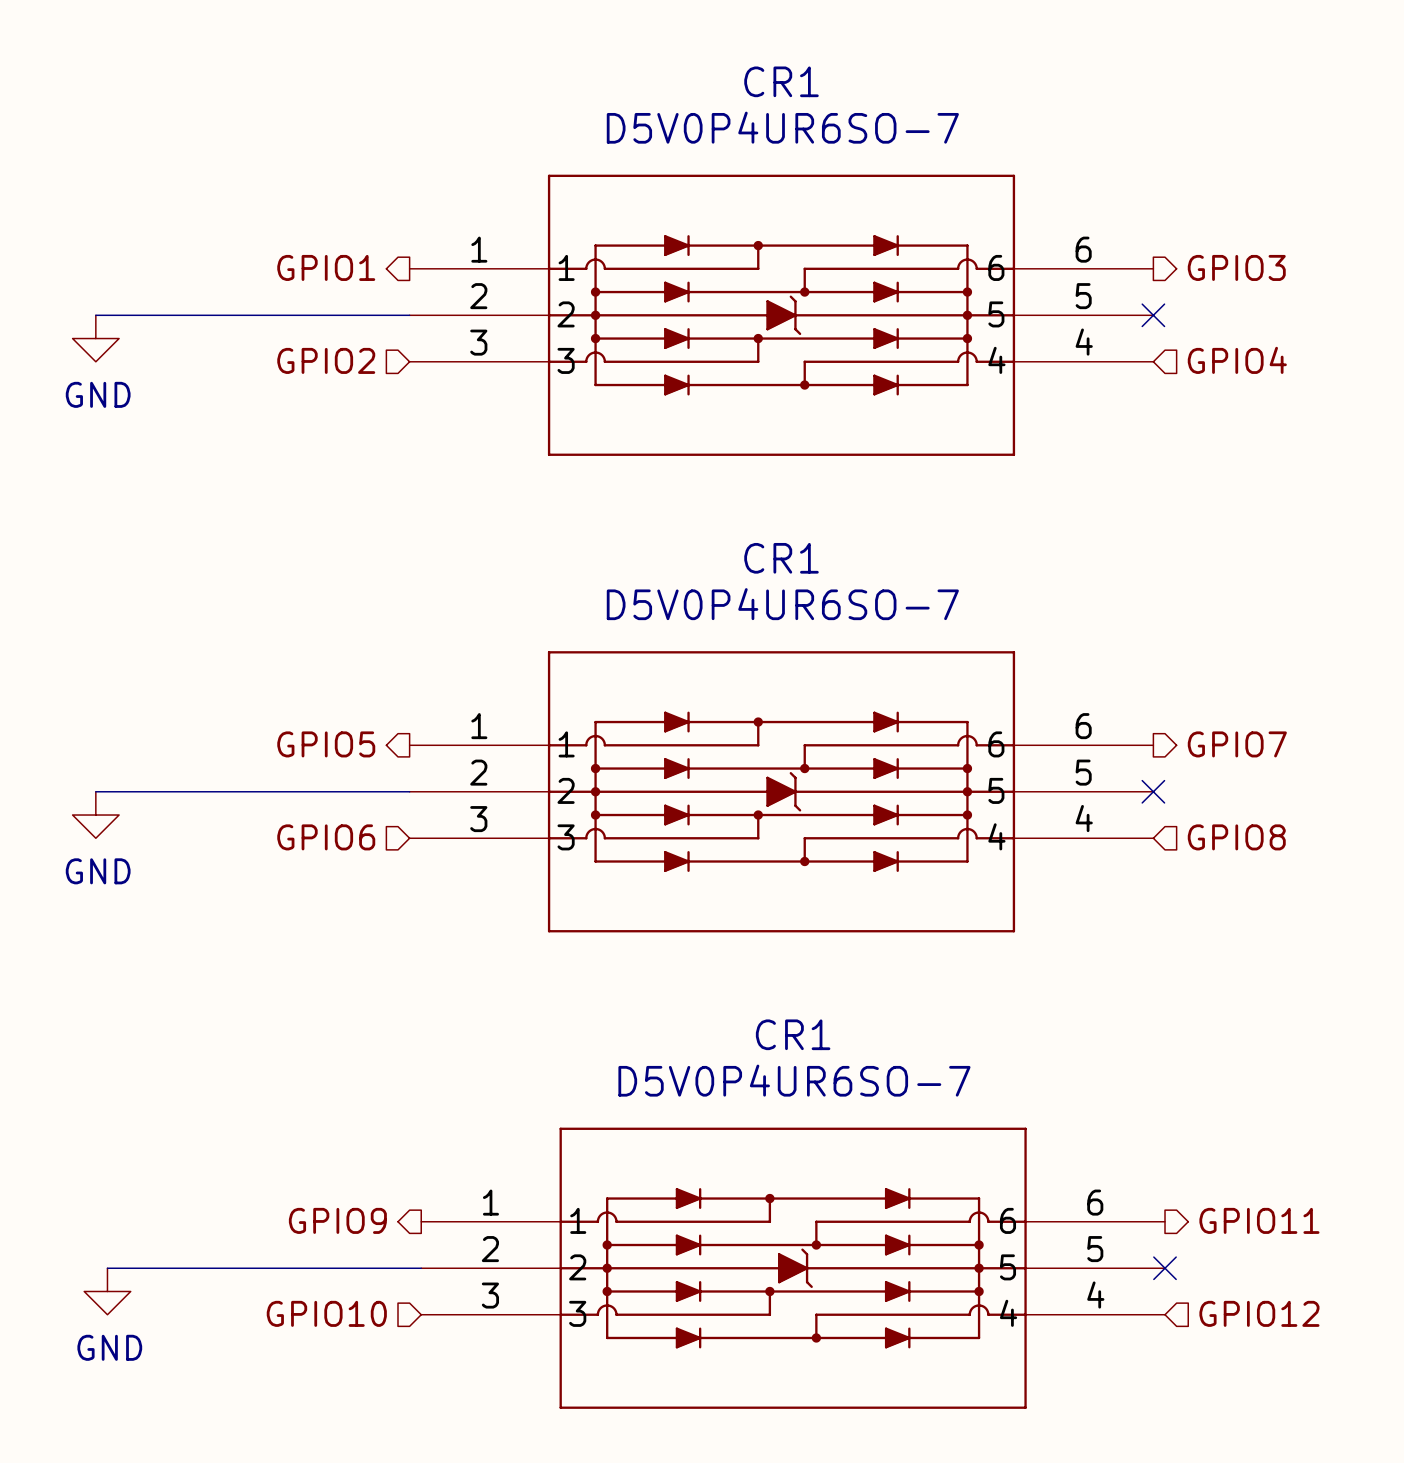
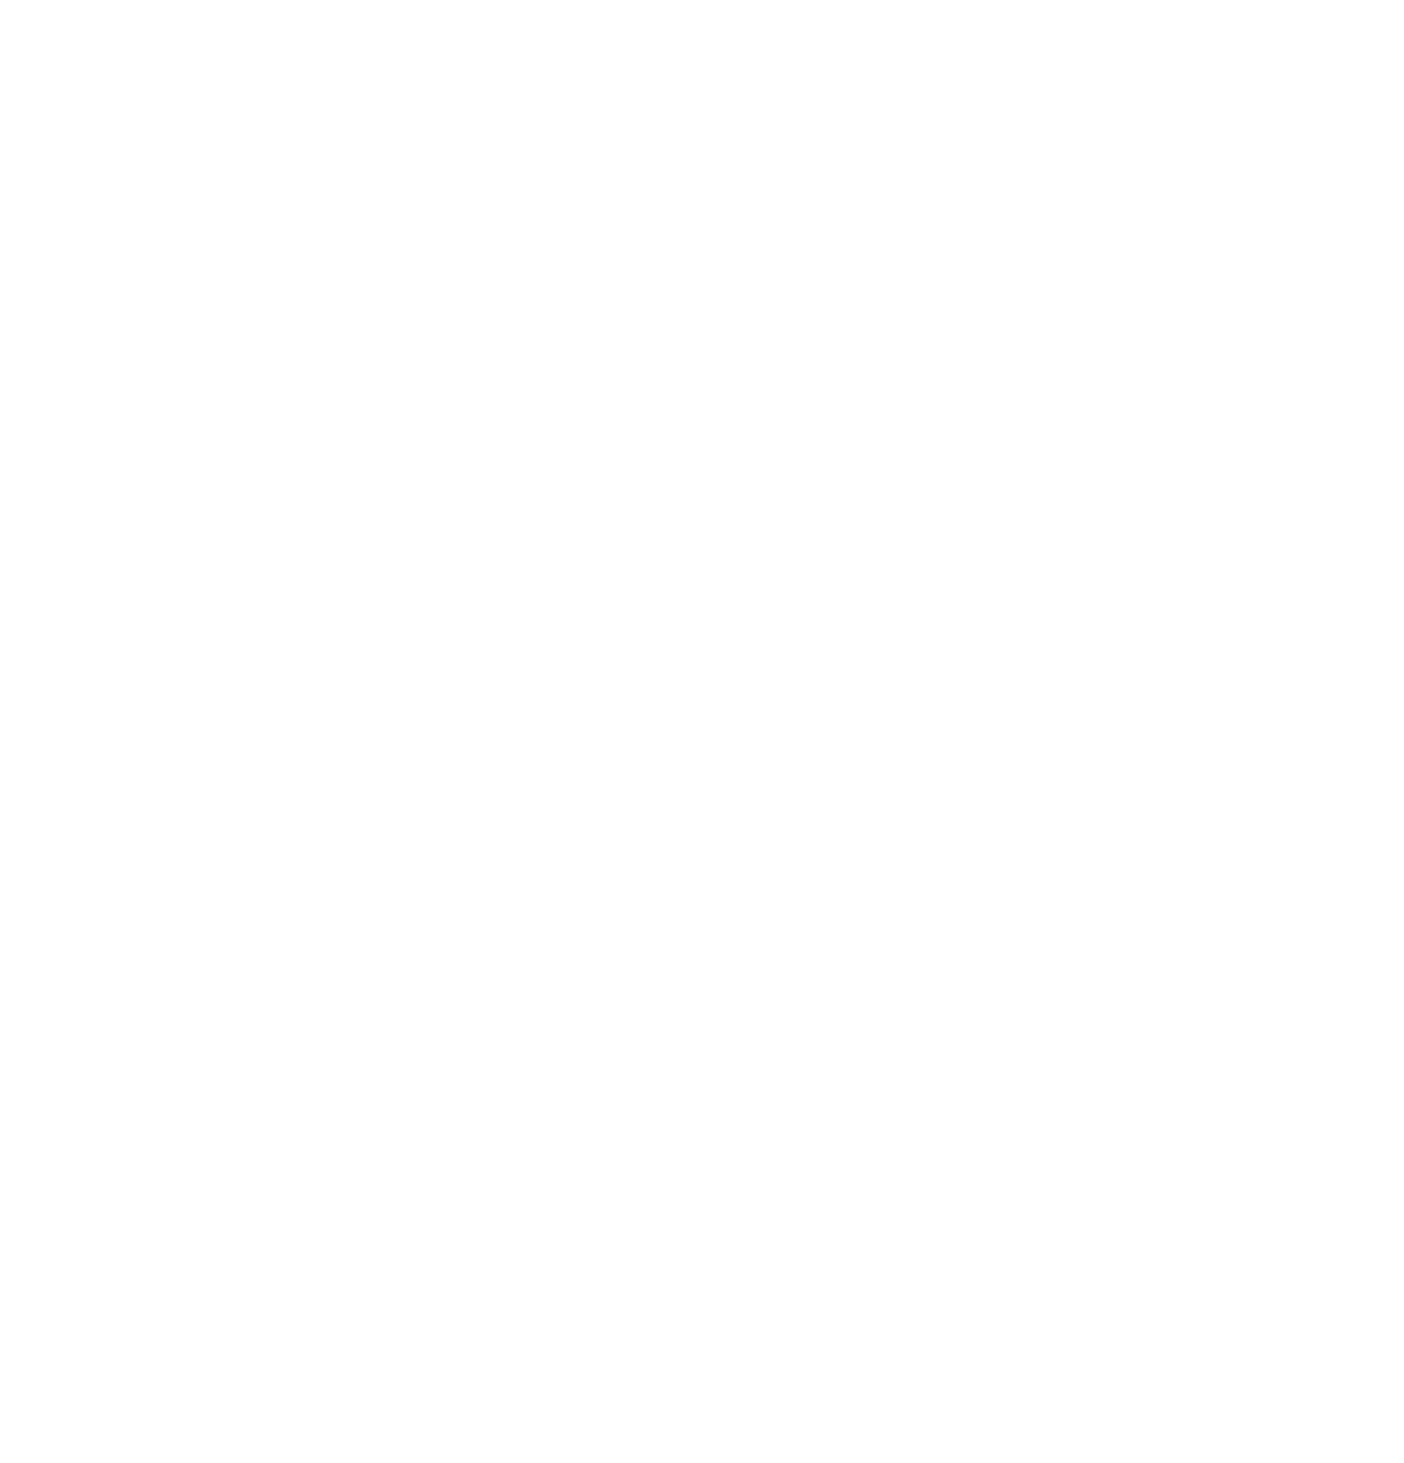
hierarchical label: GPIO1 (326, 267) -> none
hierarchical label: GPIO3 (1236, 267) -> none
wire: (95, 315) (409, 315) -> none
CR1: D5V0P4UR6SO-7 (781, 315) -> none
no-connect mark: (1153, 315) -> none
power symbol: GND (95, 338) -> none
hierarchical label: GPIO2 (326, 360) -> none
hierarchical label: GPIO4 (1237, 360) -> none
hierarchical label: GPIO5 (326, 744) -> none
hierarchical label: GPIO7 (1237, 744) -> none
wire: (95, 791) (409, 791) -> none
CR1: D5V0P4UR6SO-7 (781, 791) -> none
no-connect mark: (1153, 791) -> none
power symbol: GND (95, 815) -> none
hierarchical label: GPIO6 (326, 837) -> none
hierarchical label: GPIO8 (1236, 837) -> none
hierarchical label: GPIO9 (337, 1220) -> none
hierarchical label: GPIO11 (1259, 1220) -> none
wire: (107, 1268) (421, 1268) -> none
CR1: D5V0P4UR6SO-7 (793, 1268) -> none
no-connect mark: (1165, 1268) -> none
power symbol: GND (107, 1291) -> none
hierarchical label: GPIO10 (326, 1313) -> none
hierarchical label: GPIO12 (1259, 1313) -> none

